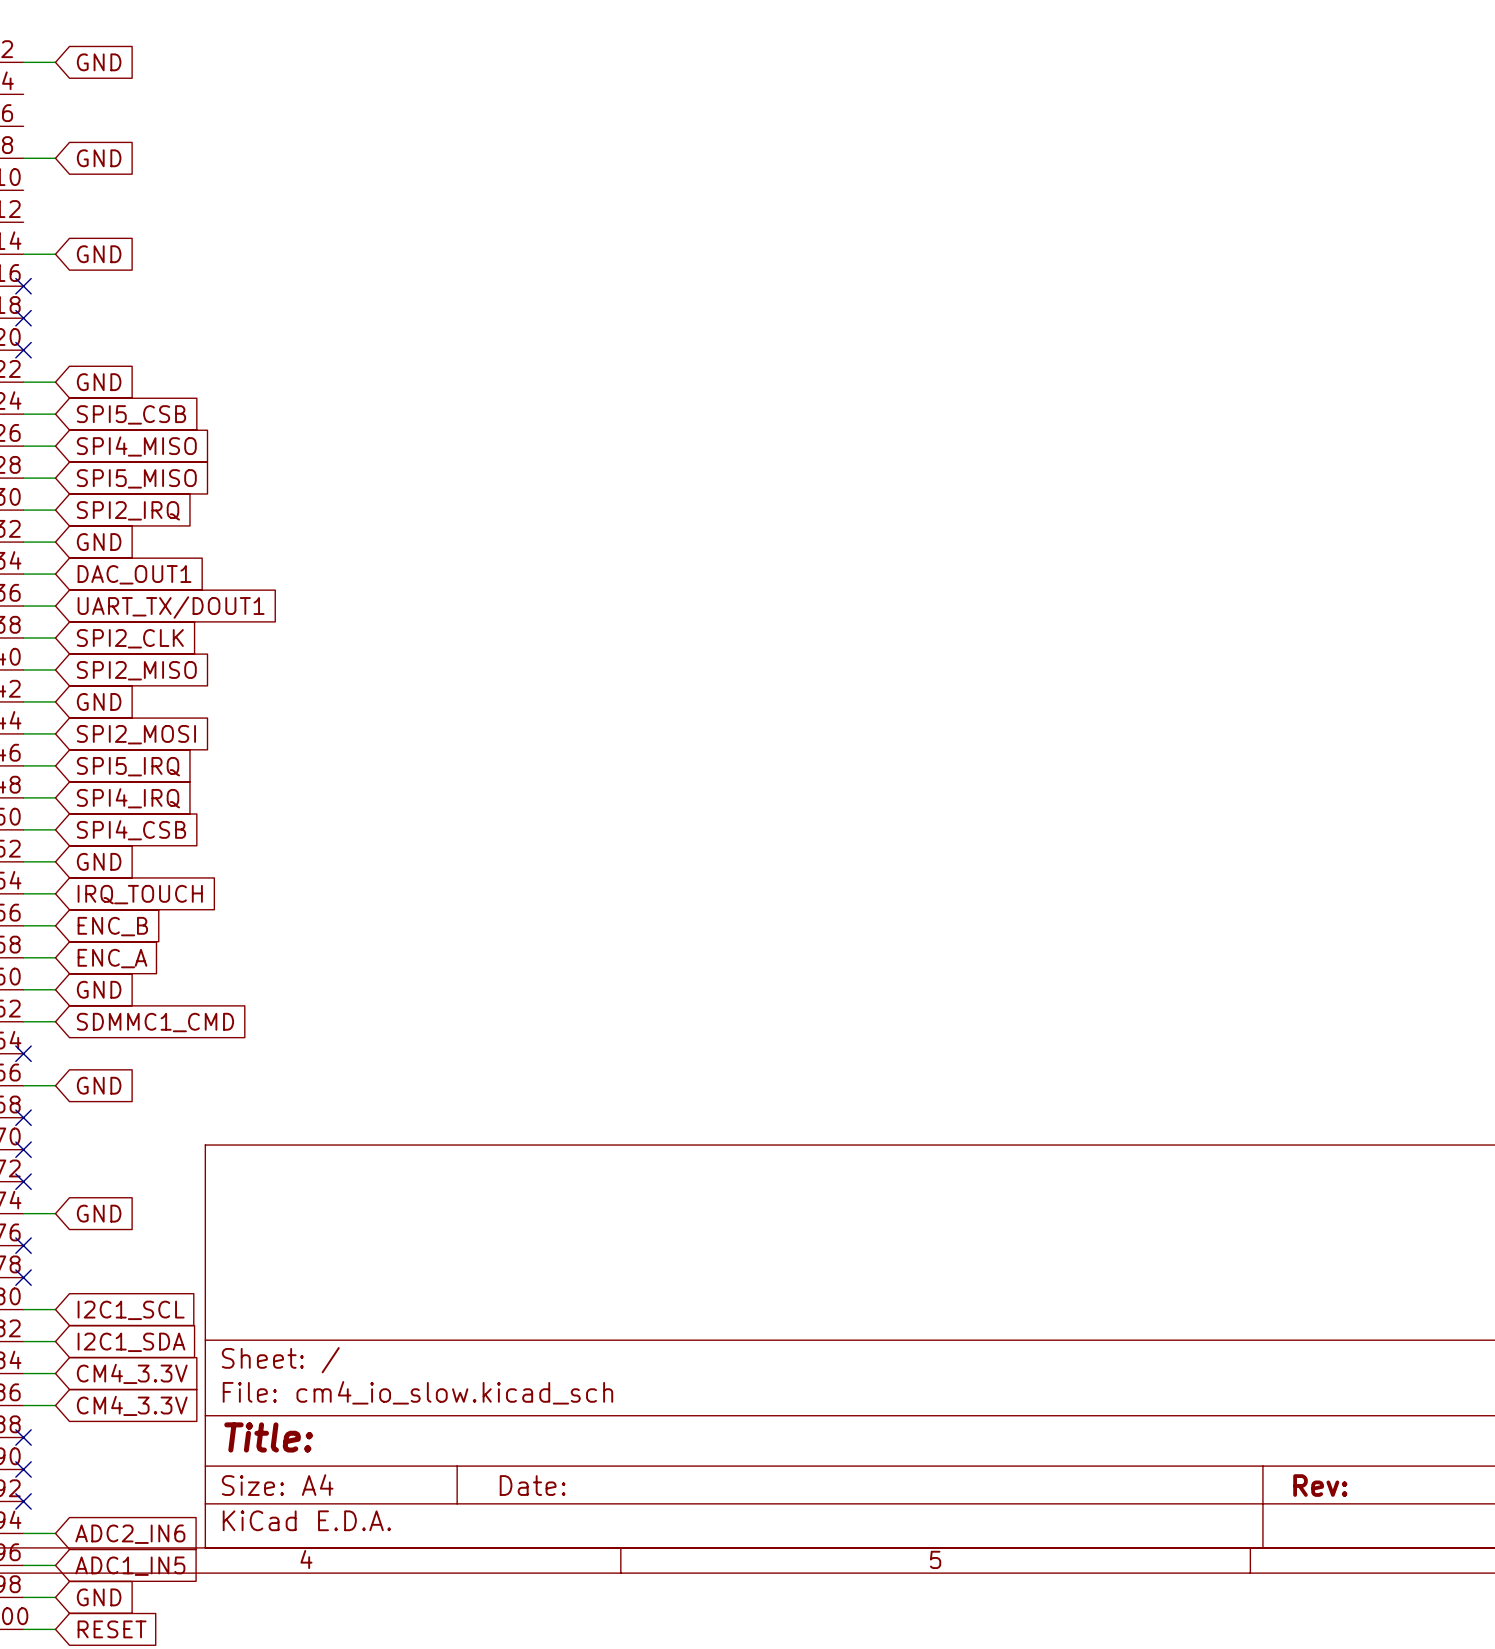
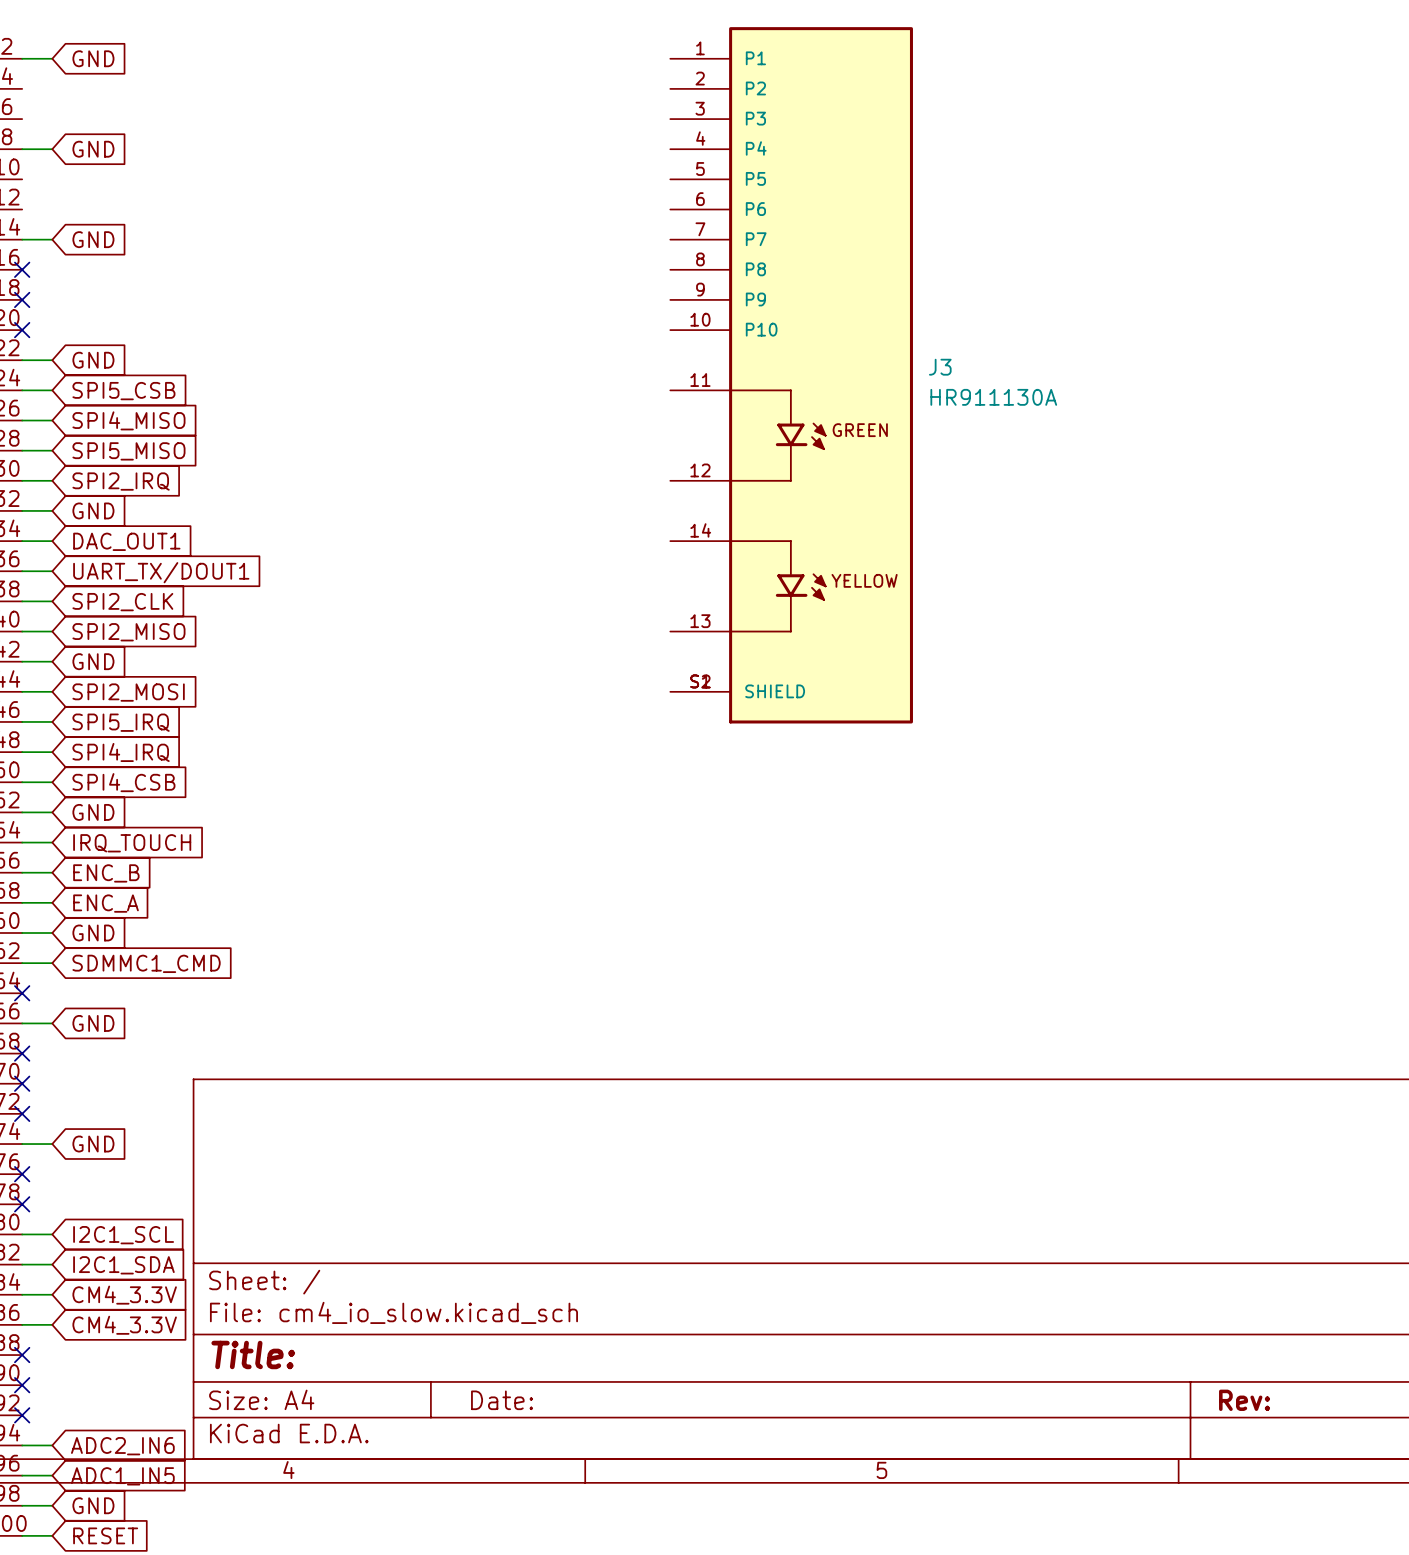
J3: none -> HR911130A (791, 375)

